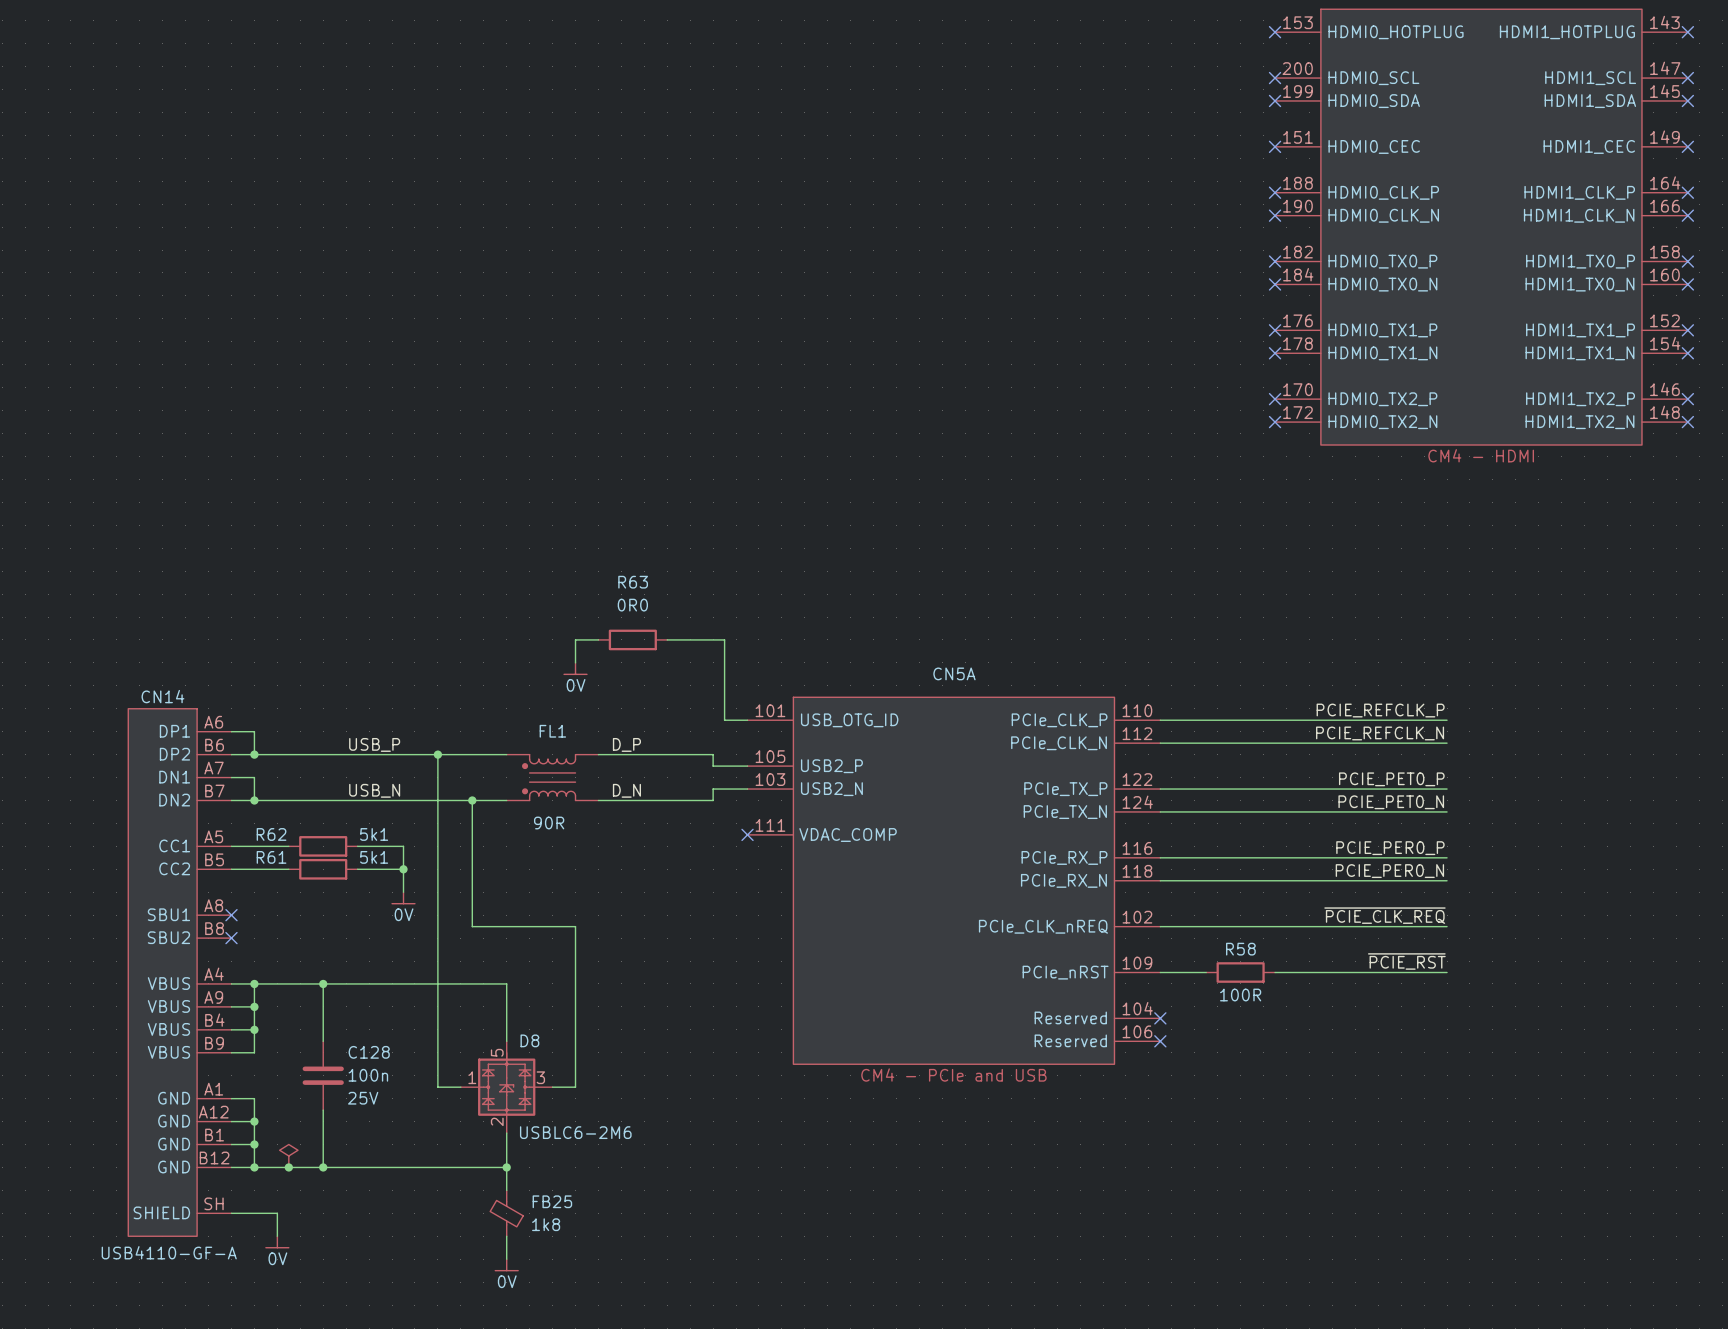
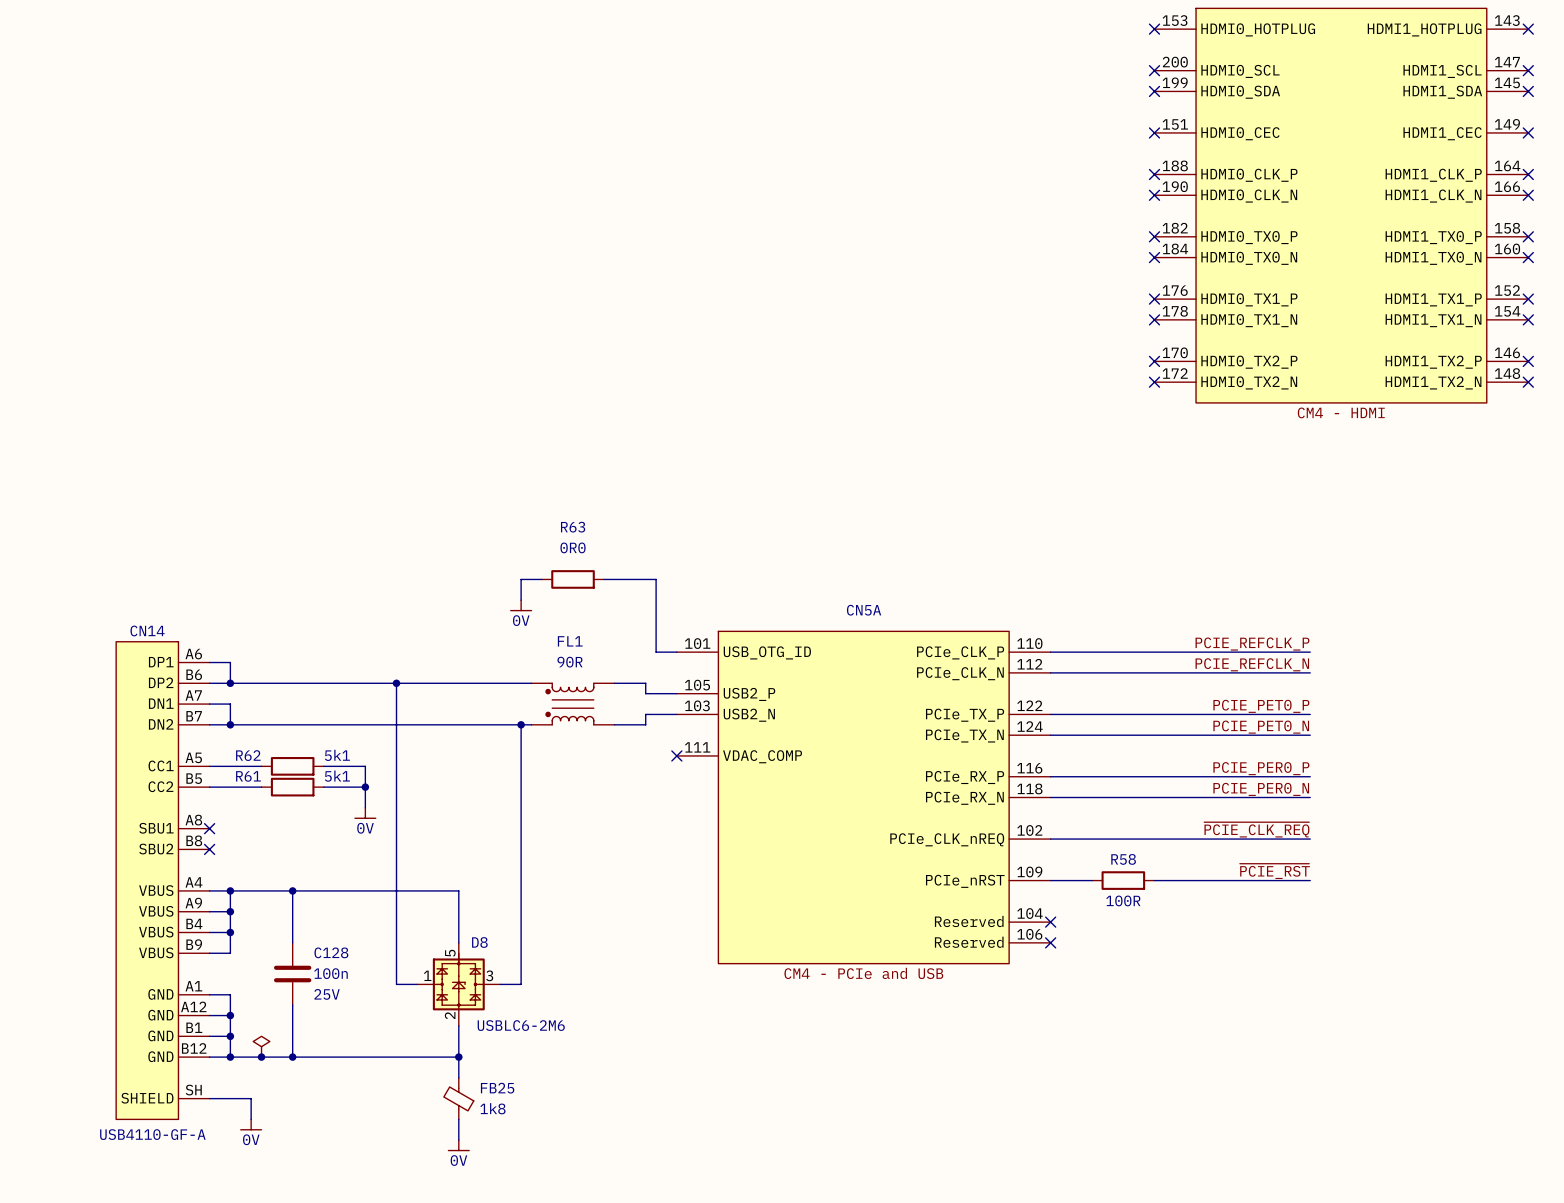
FL1 name position: FL1 (552, 731) -> FL1 (570, 641)
label: USB_P (374, 744) -> none
label: D_P (626, 744) -> none
wire: (598, 754) (678, 754) -> (458, 683) (531, 683)
FL1 flip: as is (549, 777) -> up-down (569, 704)
FL1 position: (552, 777) -> (573, 704)
label: USB_N (374, 790) -> none
label: D_N (626, 790) -> none
wire: (472, 800) (472, 926) (575, 926) -> (521, 724) (521, 839)
junction: (472, 800) -> none
junction: none -> (521, 724)
wire: (598, 800) (678, 800) -> (458, 724) (531, 724)

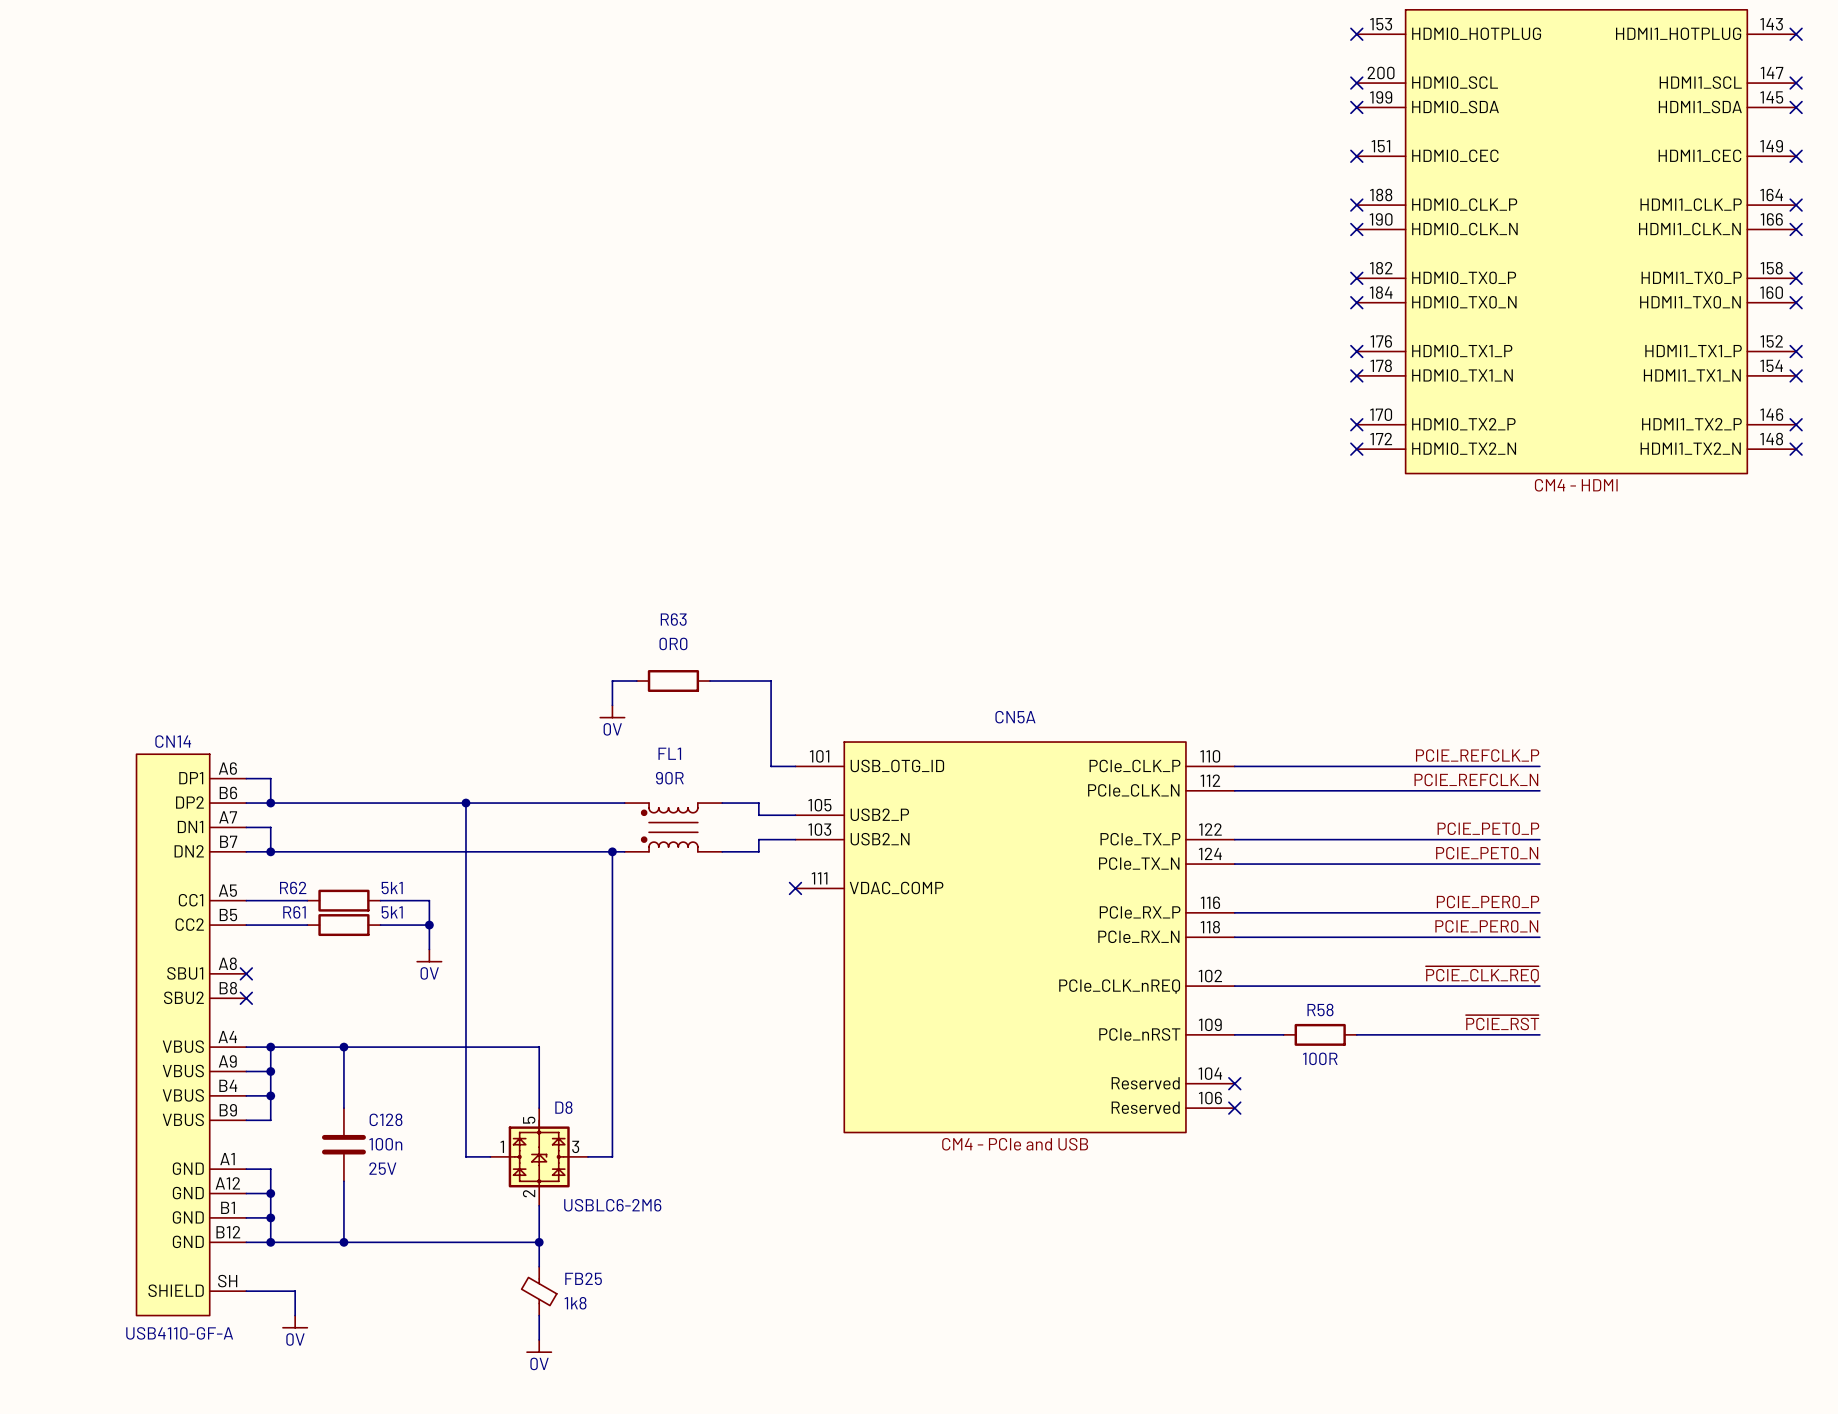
power symbol: (261, 1046) -> none
junction: (261, 1057) -> none

